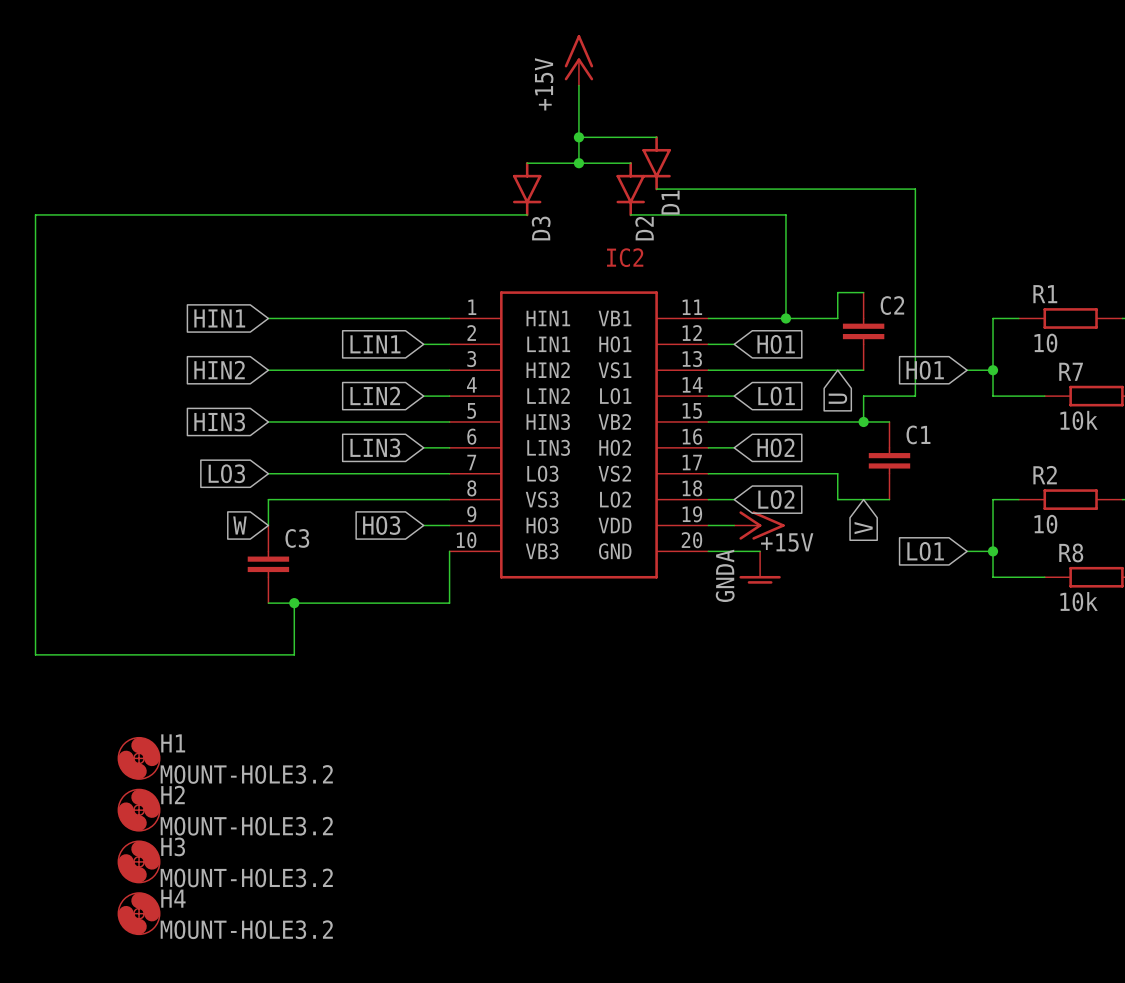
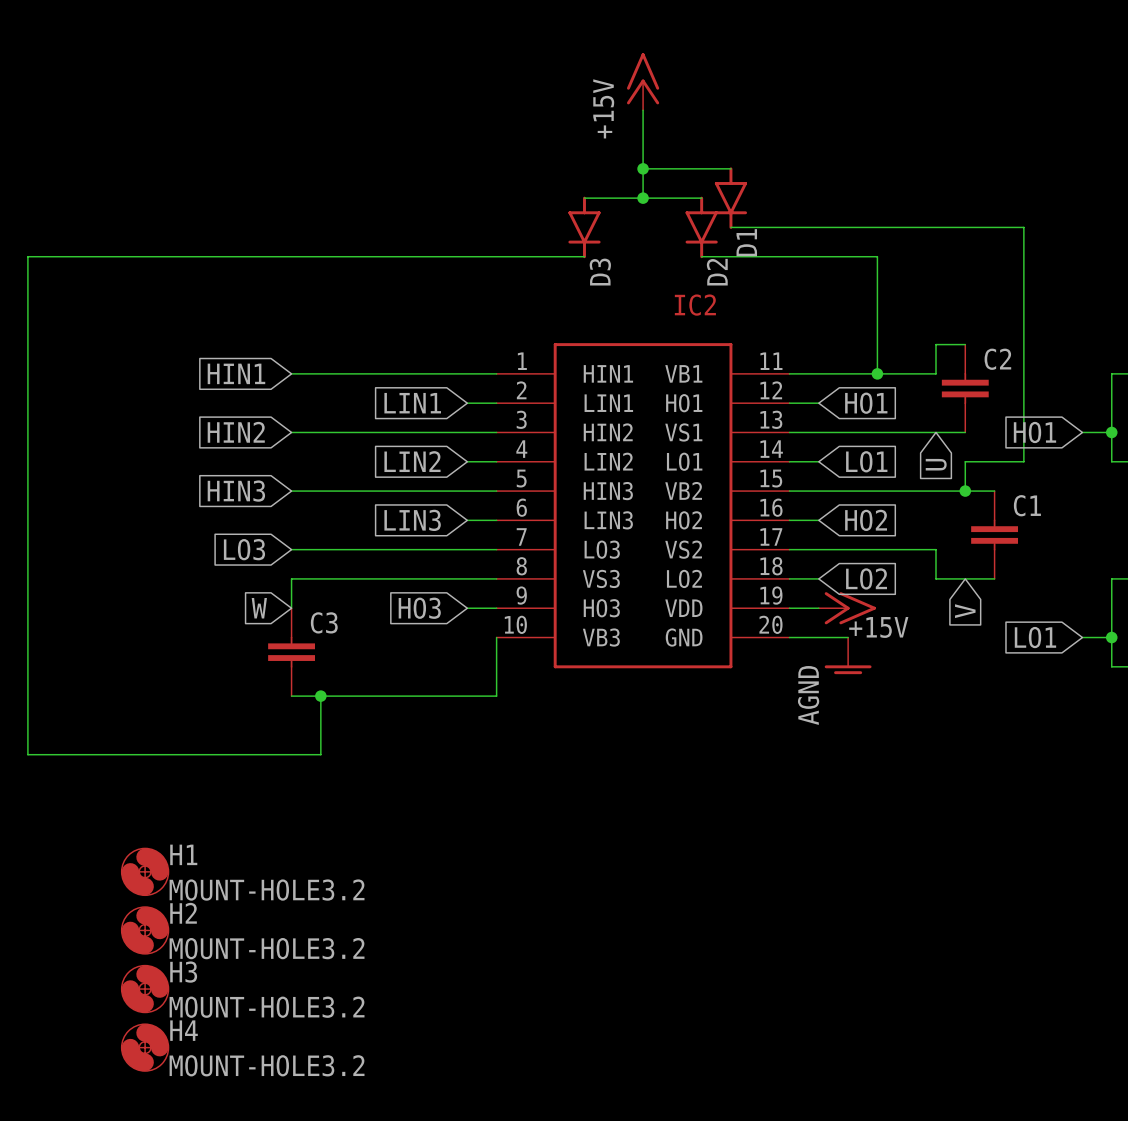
power symbol: GNDA (760, 567) -> AGND (848, 655)

